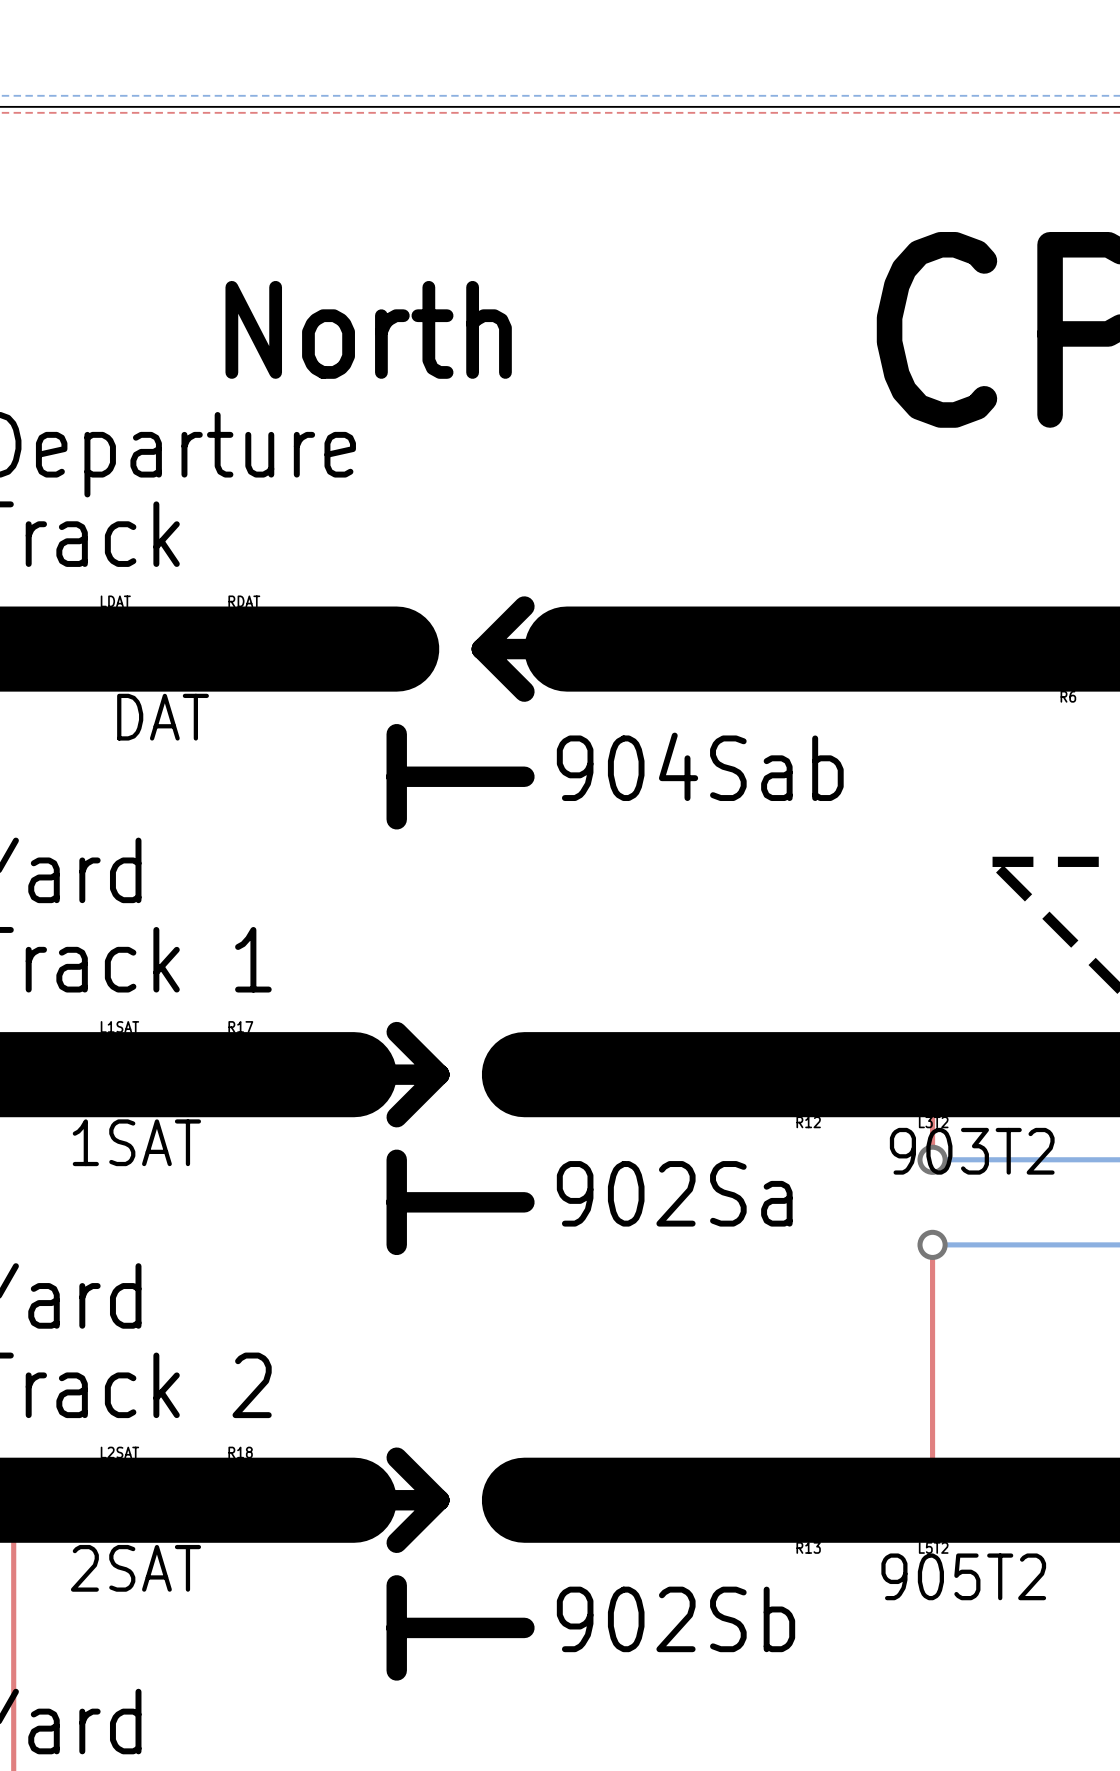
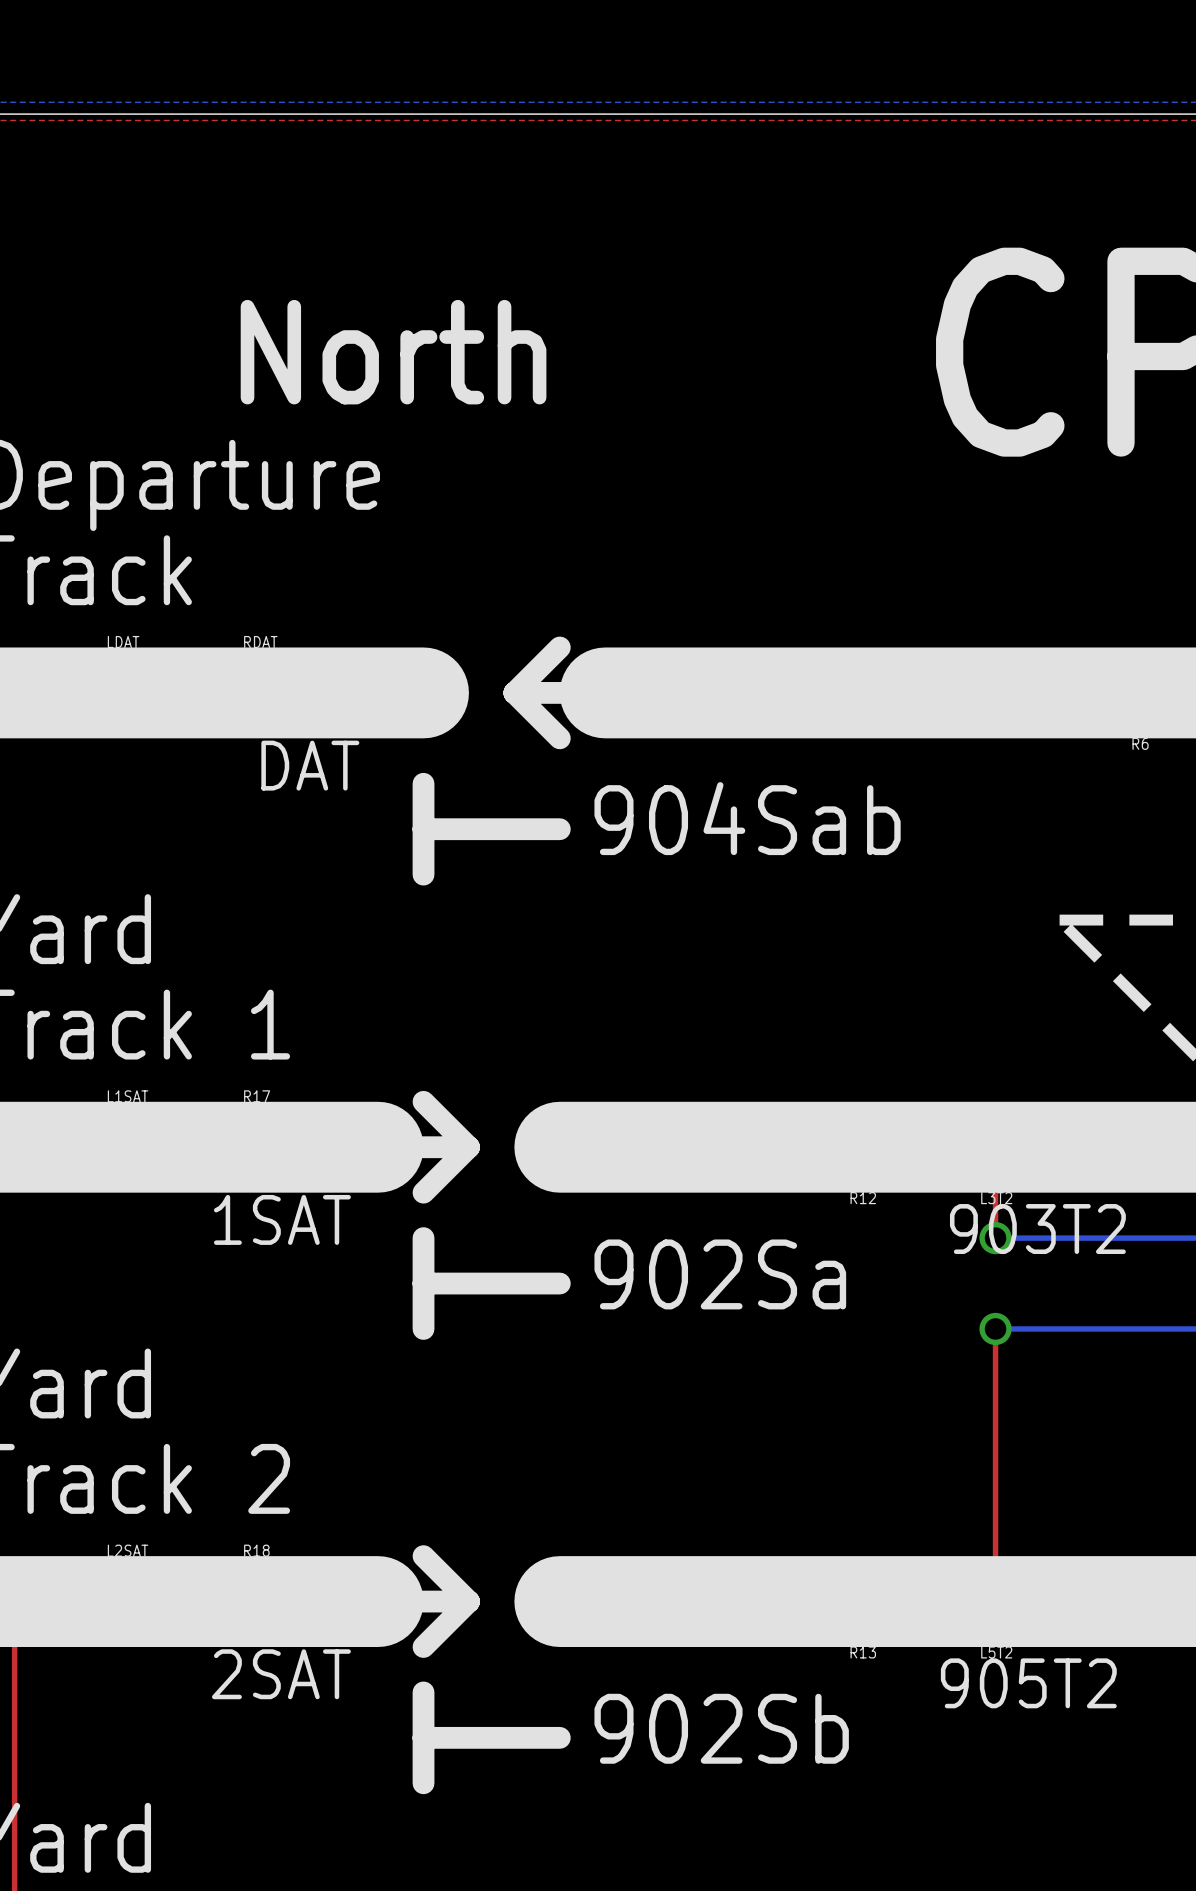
text position: DAT (163, 717) -> DAT (310, 765)
text position: 1SAT (136, 1142) -> 1SAT (282, 1219)
text position: 2SAT (135, 1568) -> 2SAT (281, 1674)

